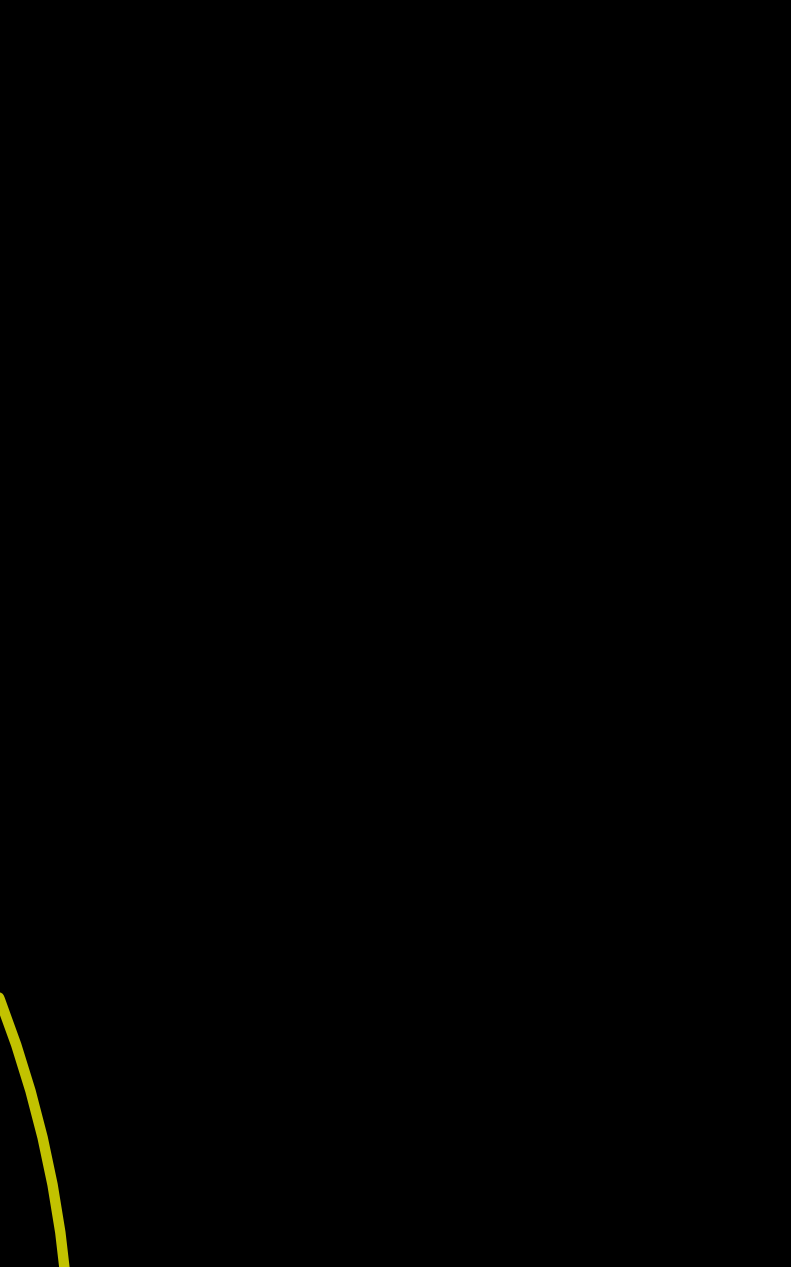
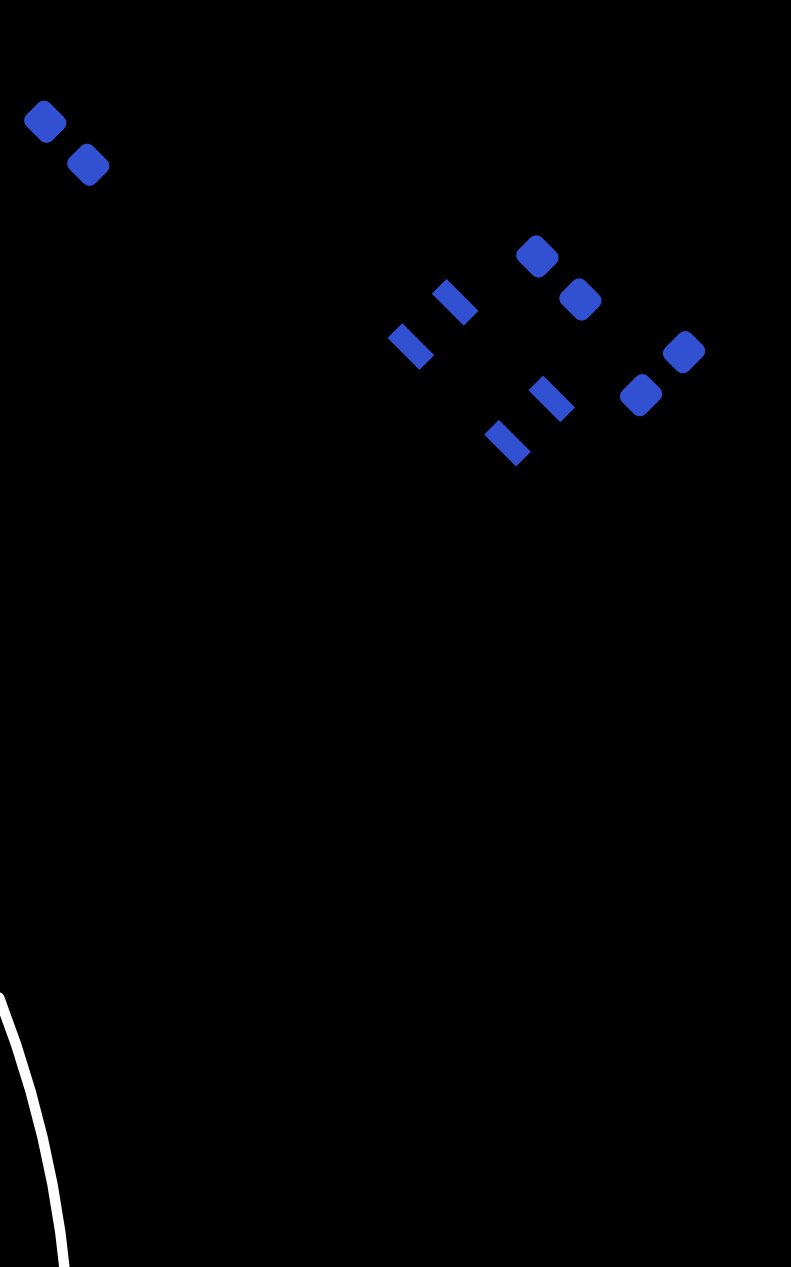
part: none -> (66, 143)
part: none -> (558, 277)
part: none -> (481, 372)
part: none -> (662, 373)

